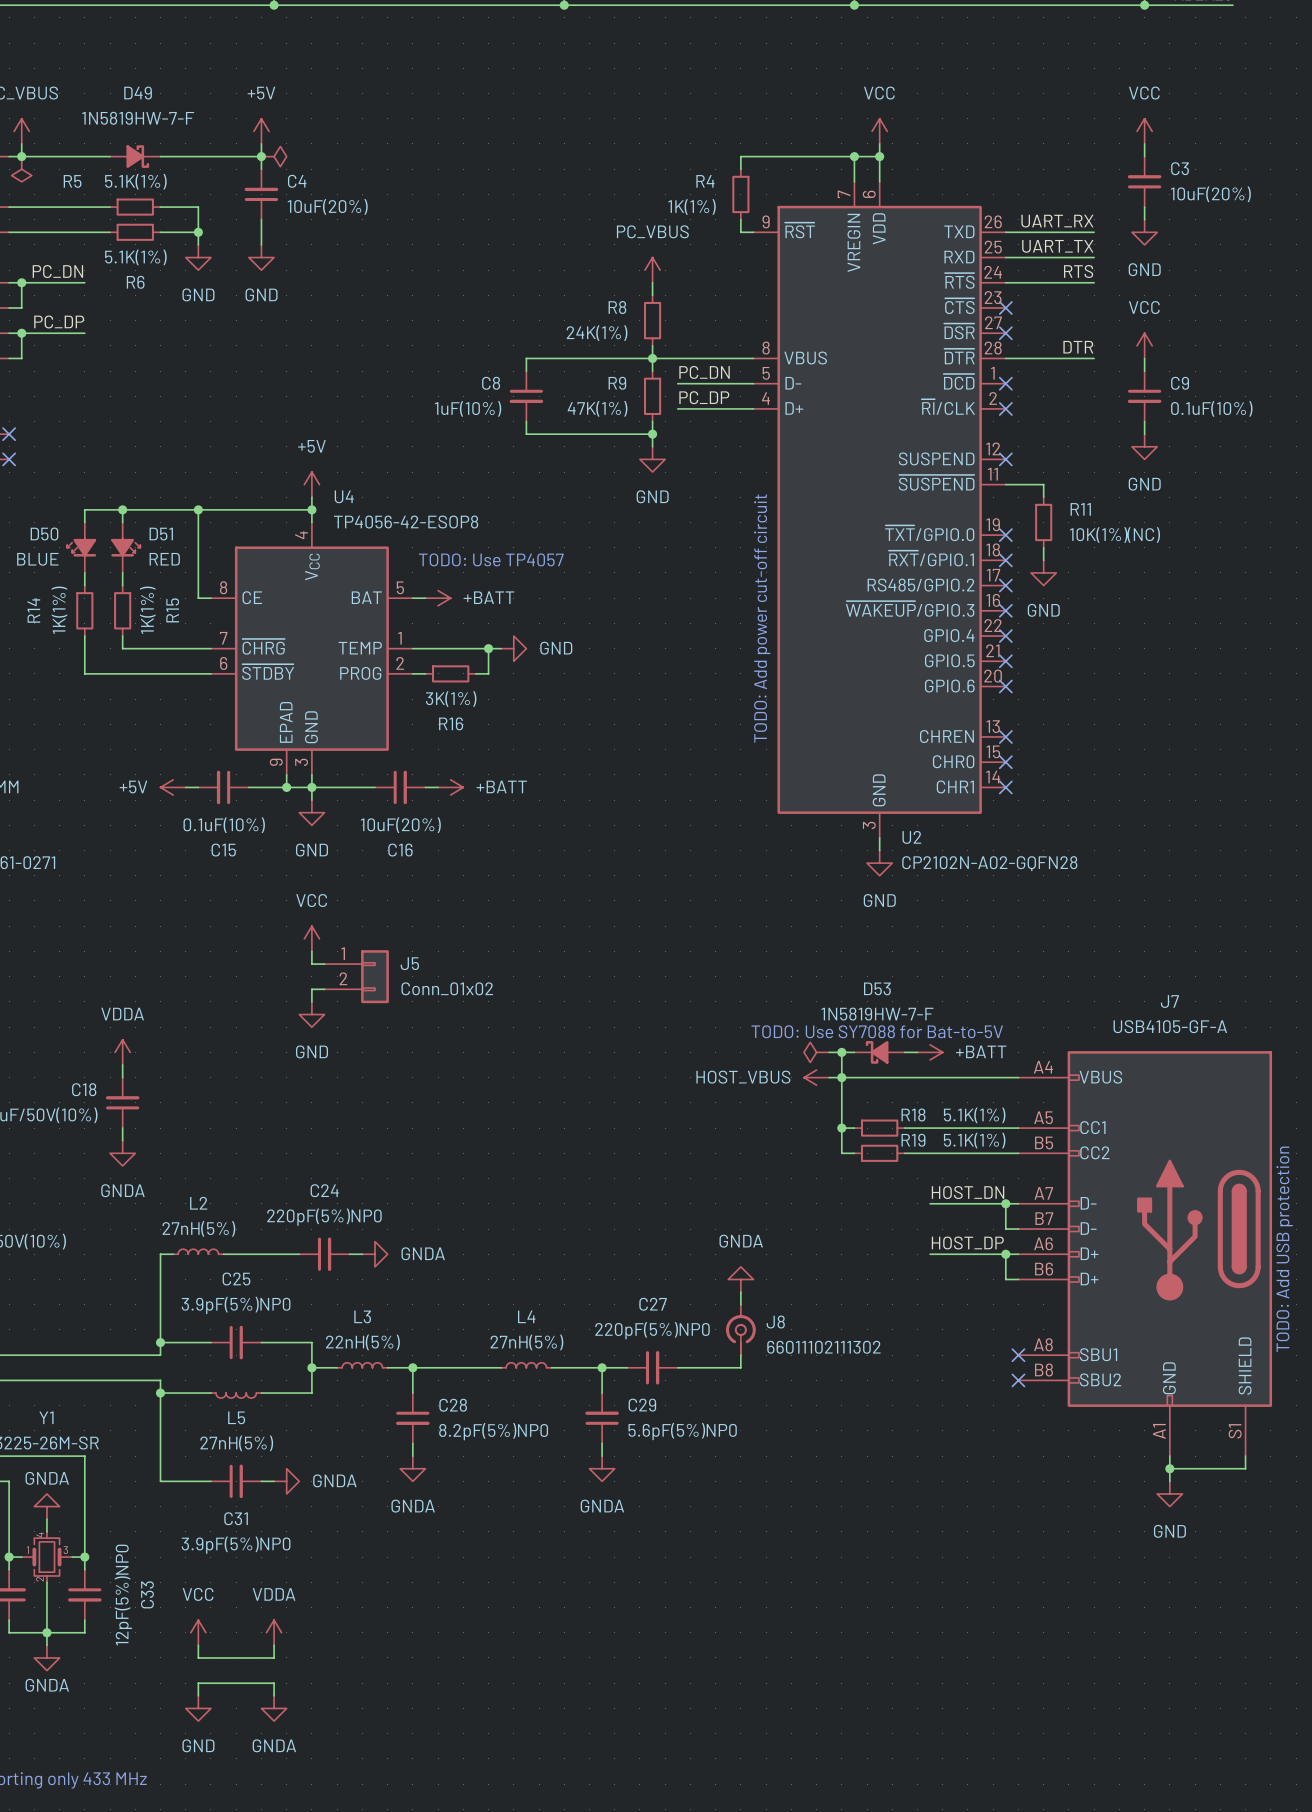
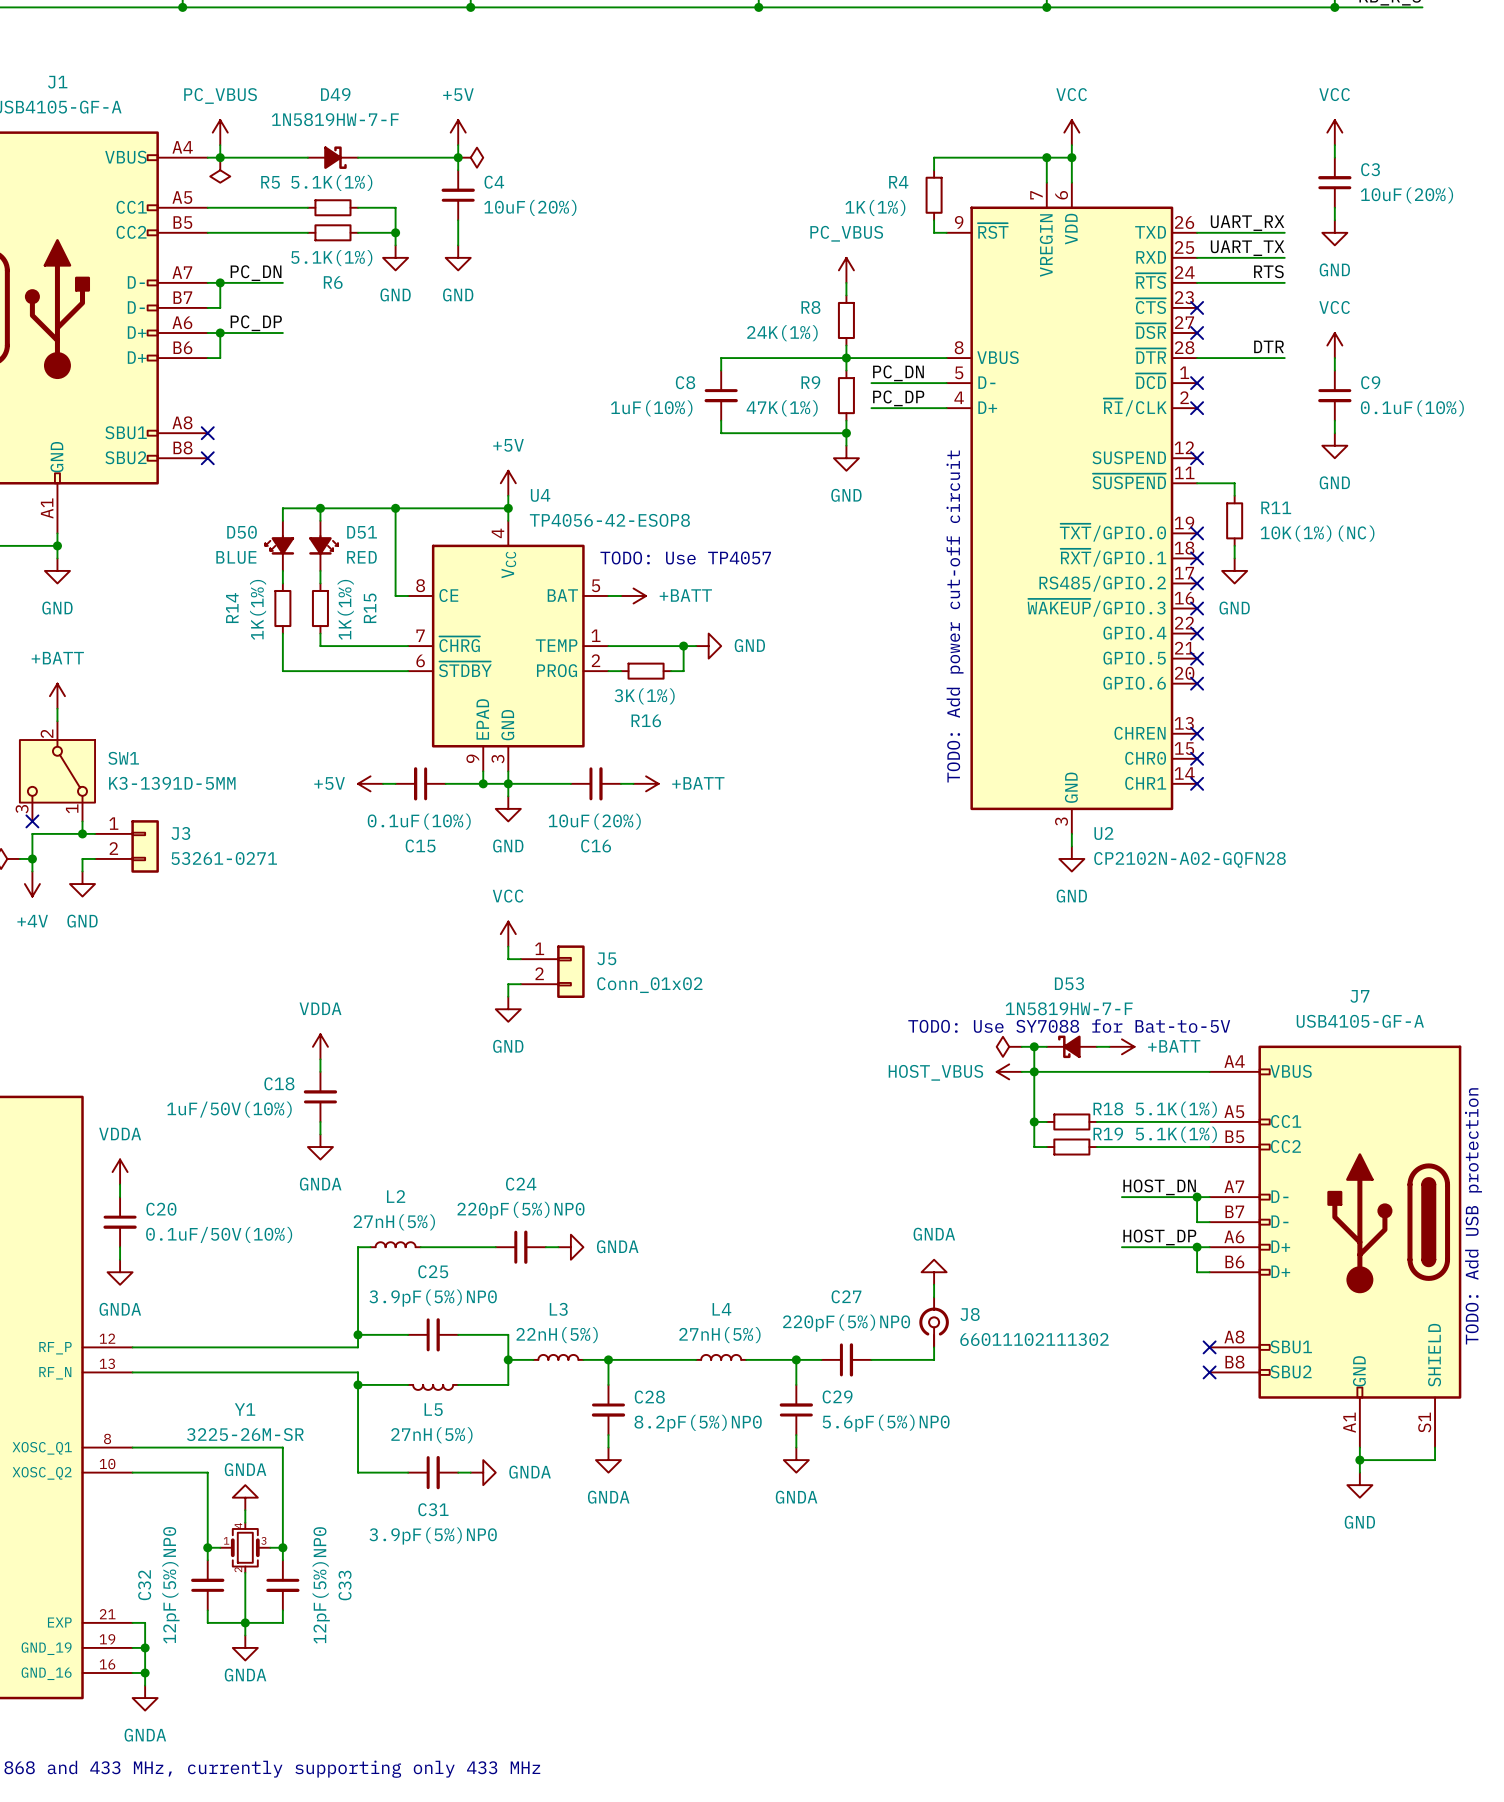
power symbol: VCC (198, 1632) -> none
power symbol: VDDA (274, 1632) -> none
wire: (198, 1645) (198, 1657) (274, 1657) (274, 1645) -> none
wire: (198, 1695) (198, 1683) (274, 1683) (274, 1695) -> none
power symbol: GND (198, 1708) -> none
power symbol: GNDA (274, 1708) -> none

